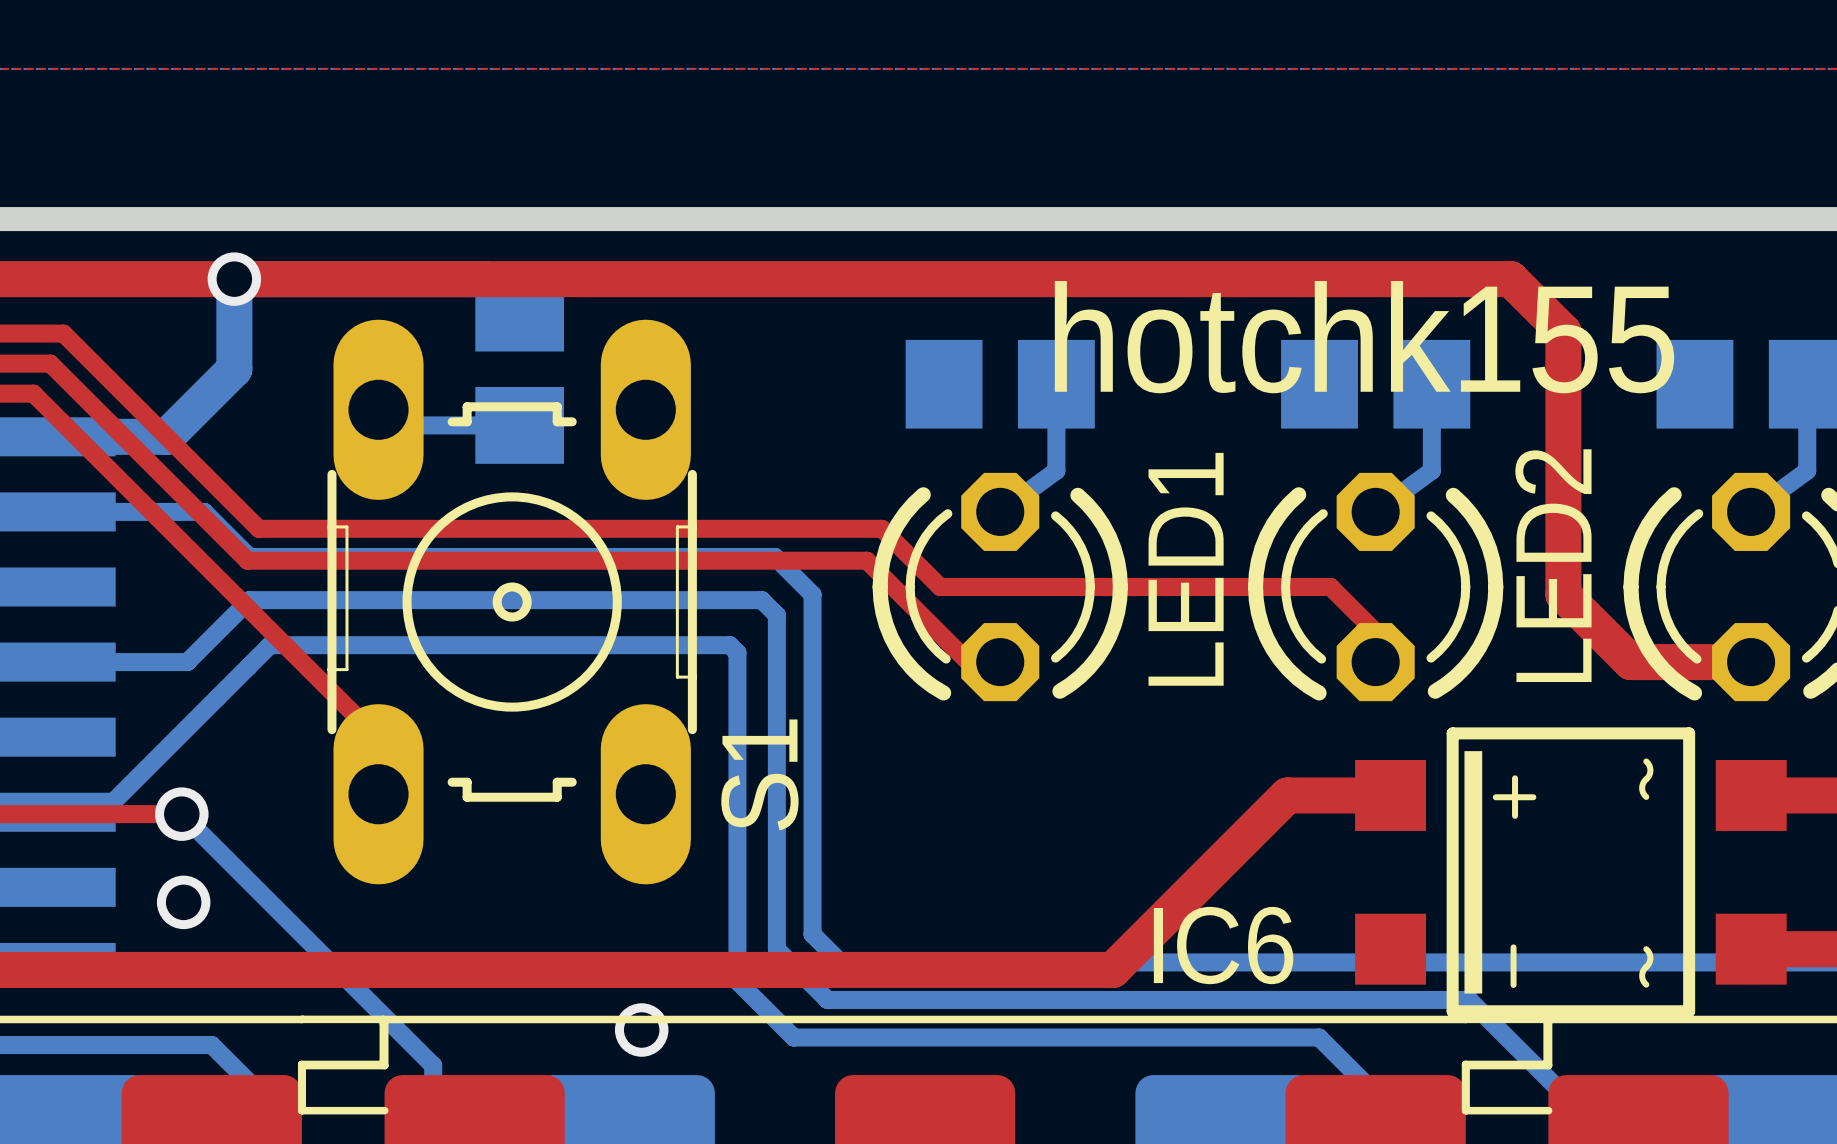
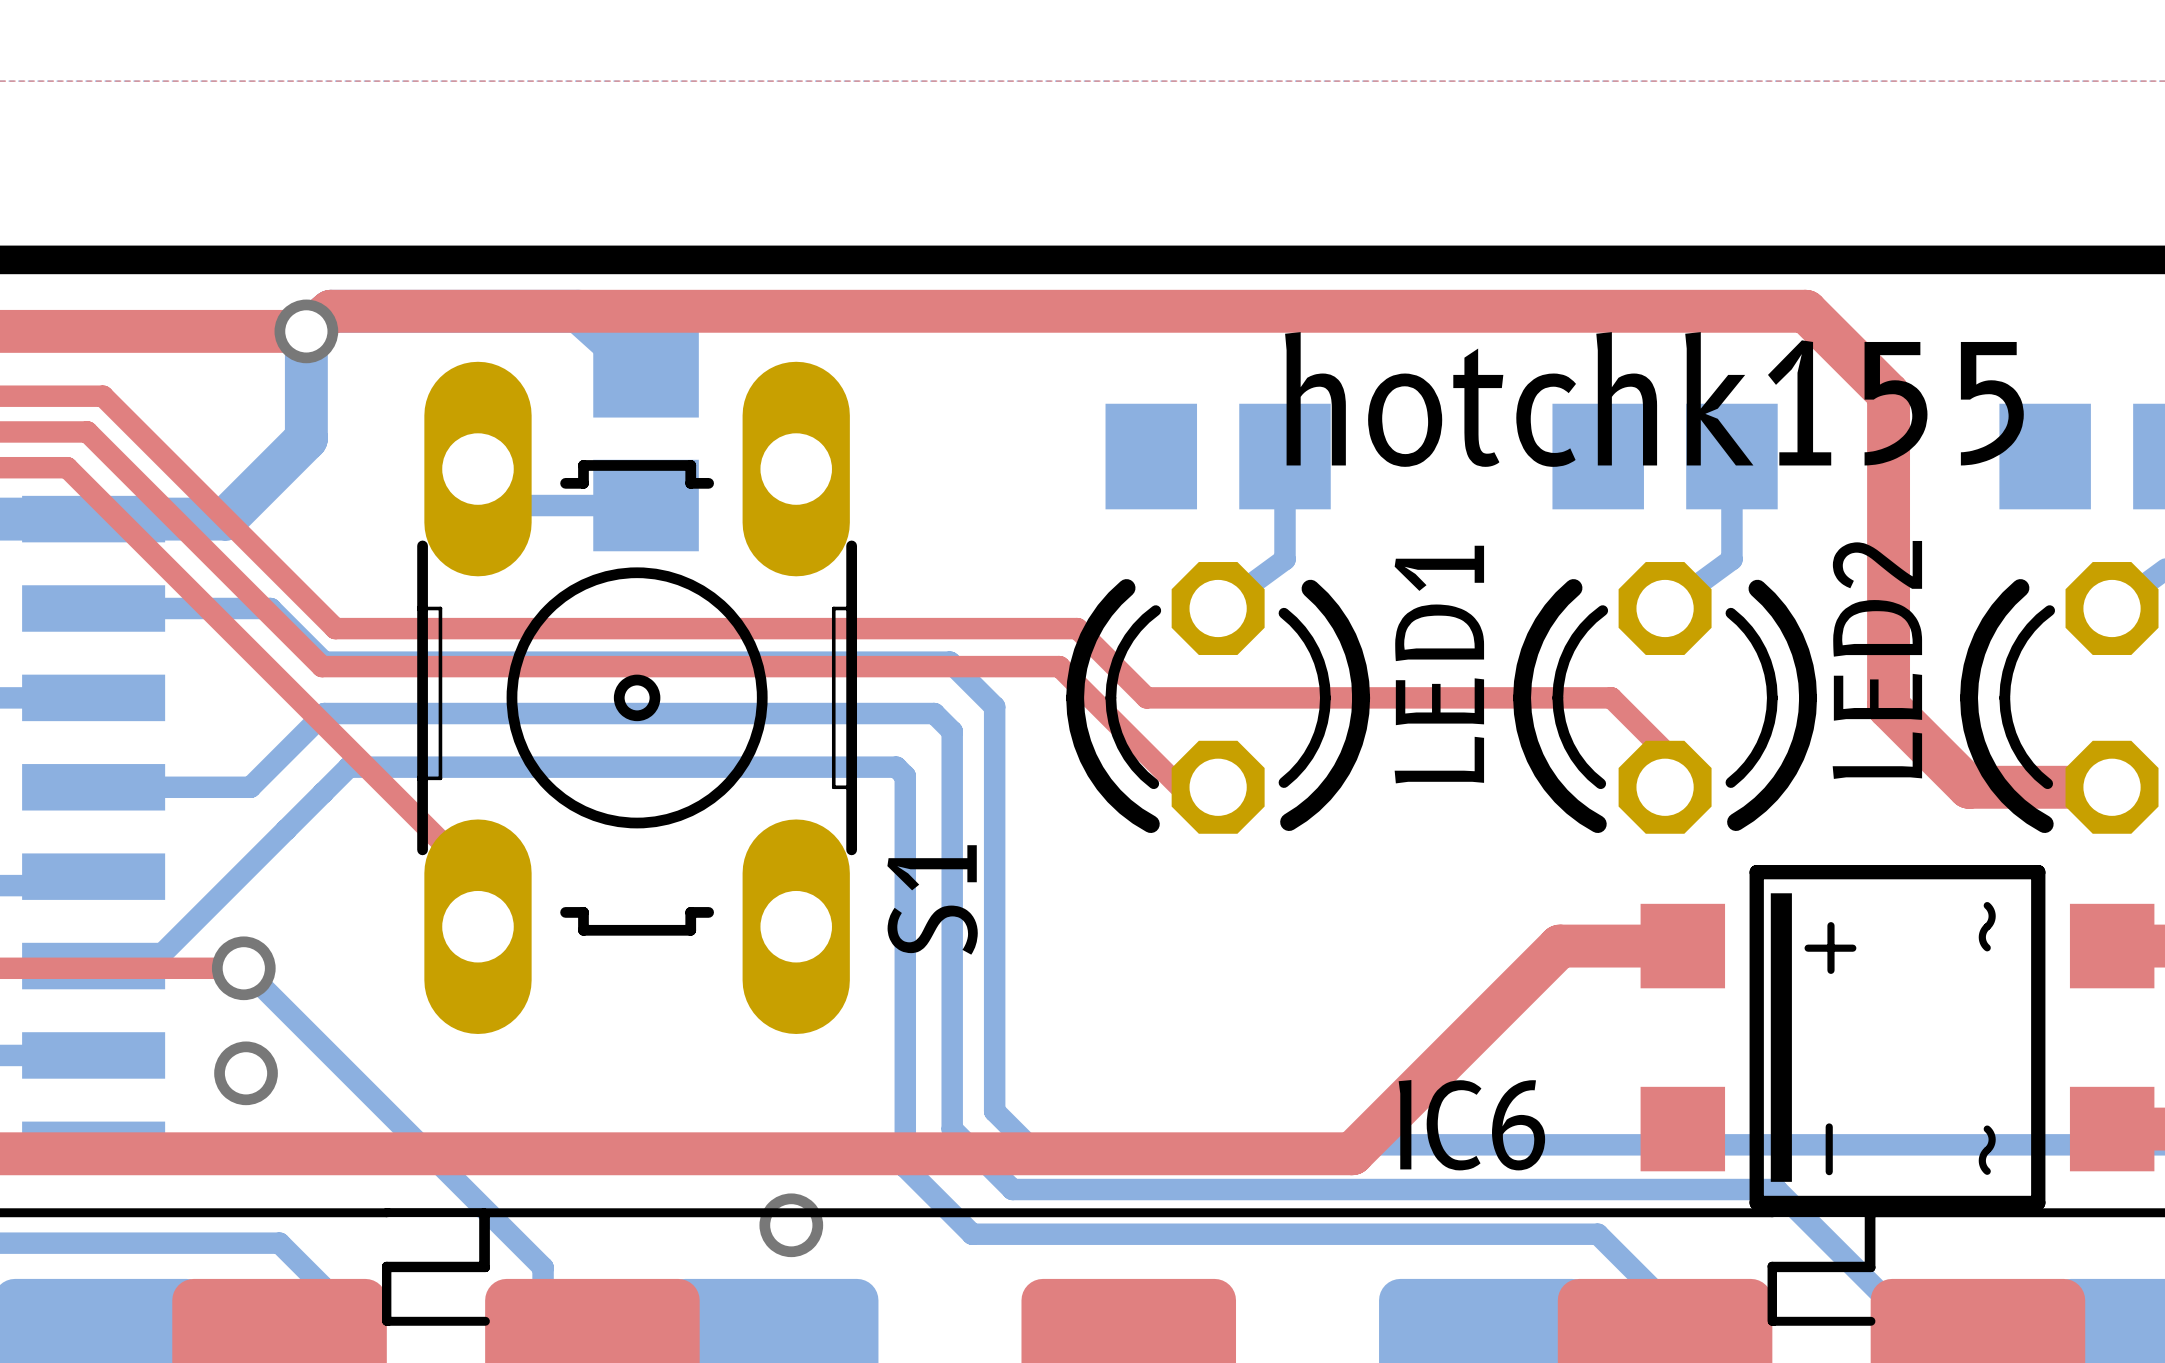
top track: (234, 279) (1510, 279) -> (306, 331) (330, 311) (1805, 311) (1825, 331)
S1 position: (512, 602) -> (637, 697)

